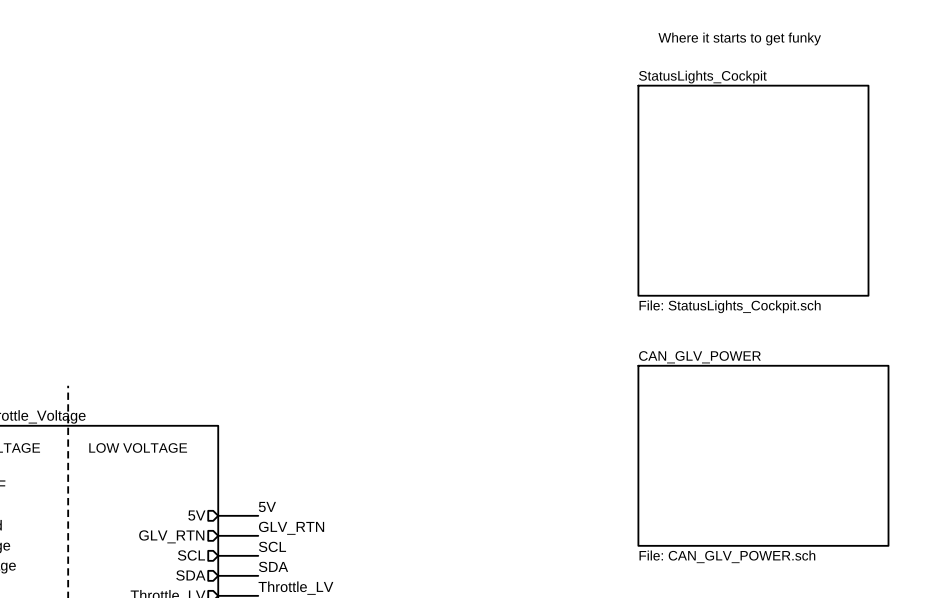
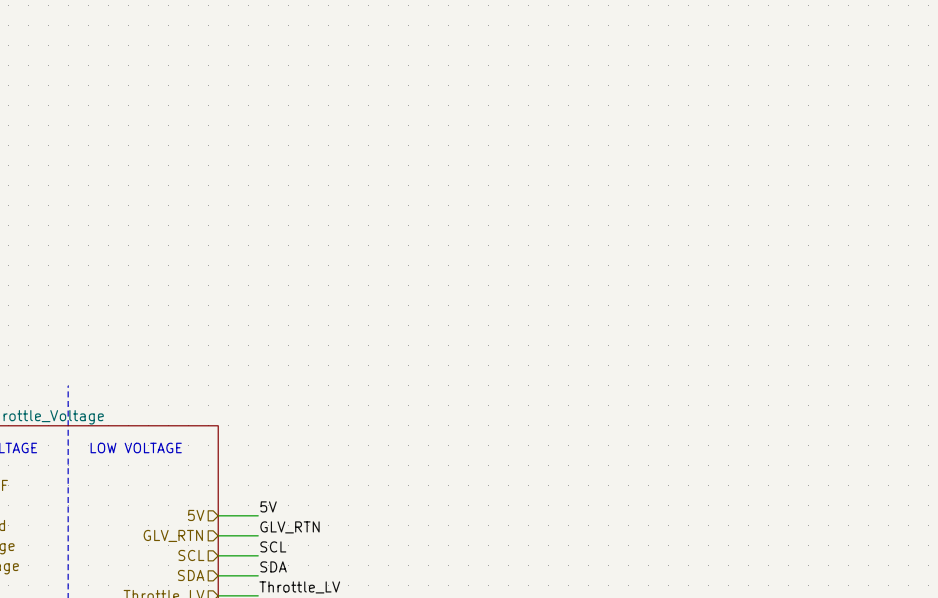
text: Where it starts to get funky (739, 38) -> none
sheet StatusLights_Cockpit: File: StatusLights_Cockpit.sch (753, 190) -> none
sheet CAN_GLV_POWER: File: CAN_GLV_POWER.sch (763, 455) -> none

